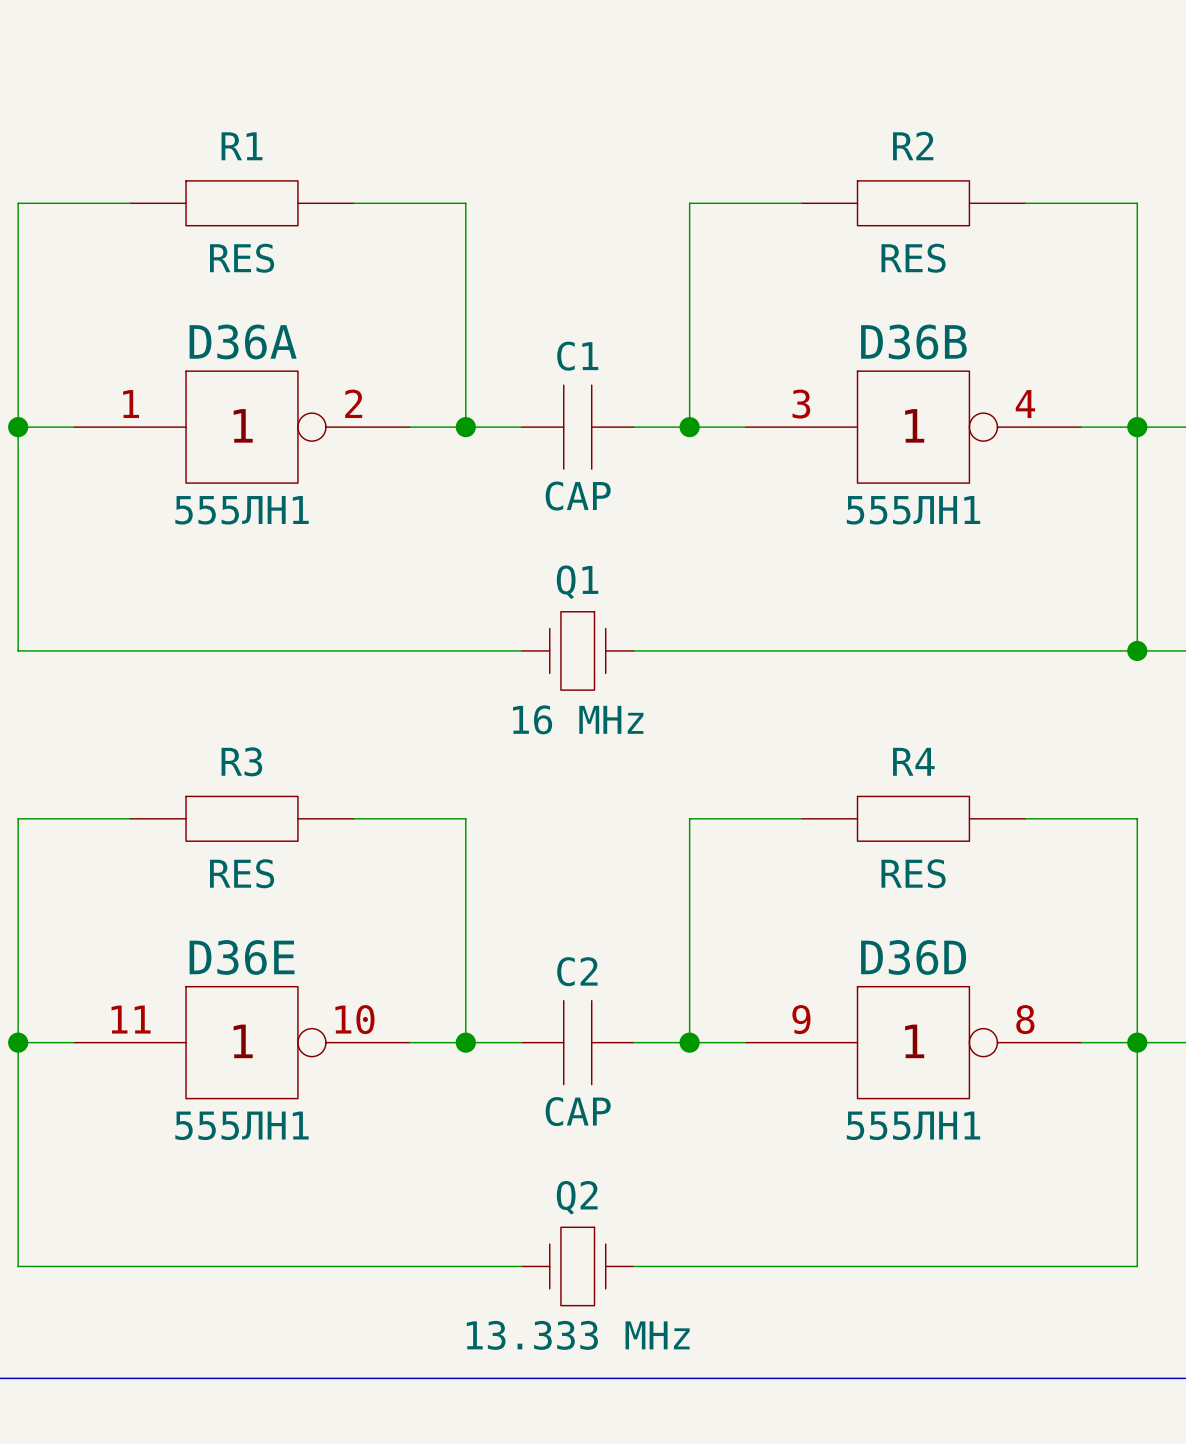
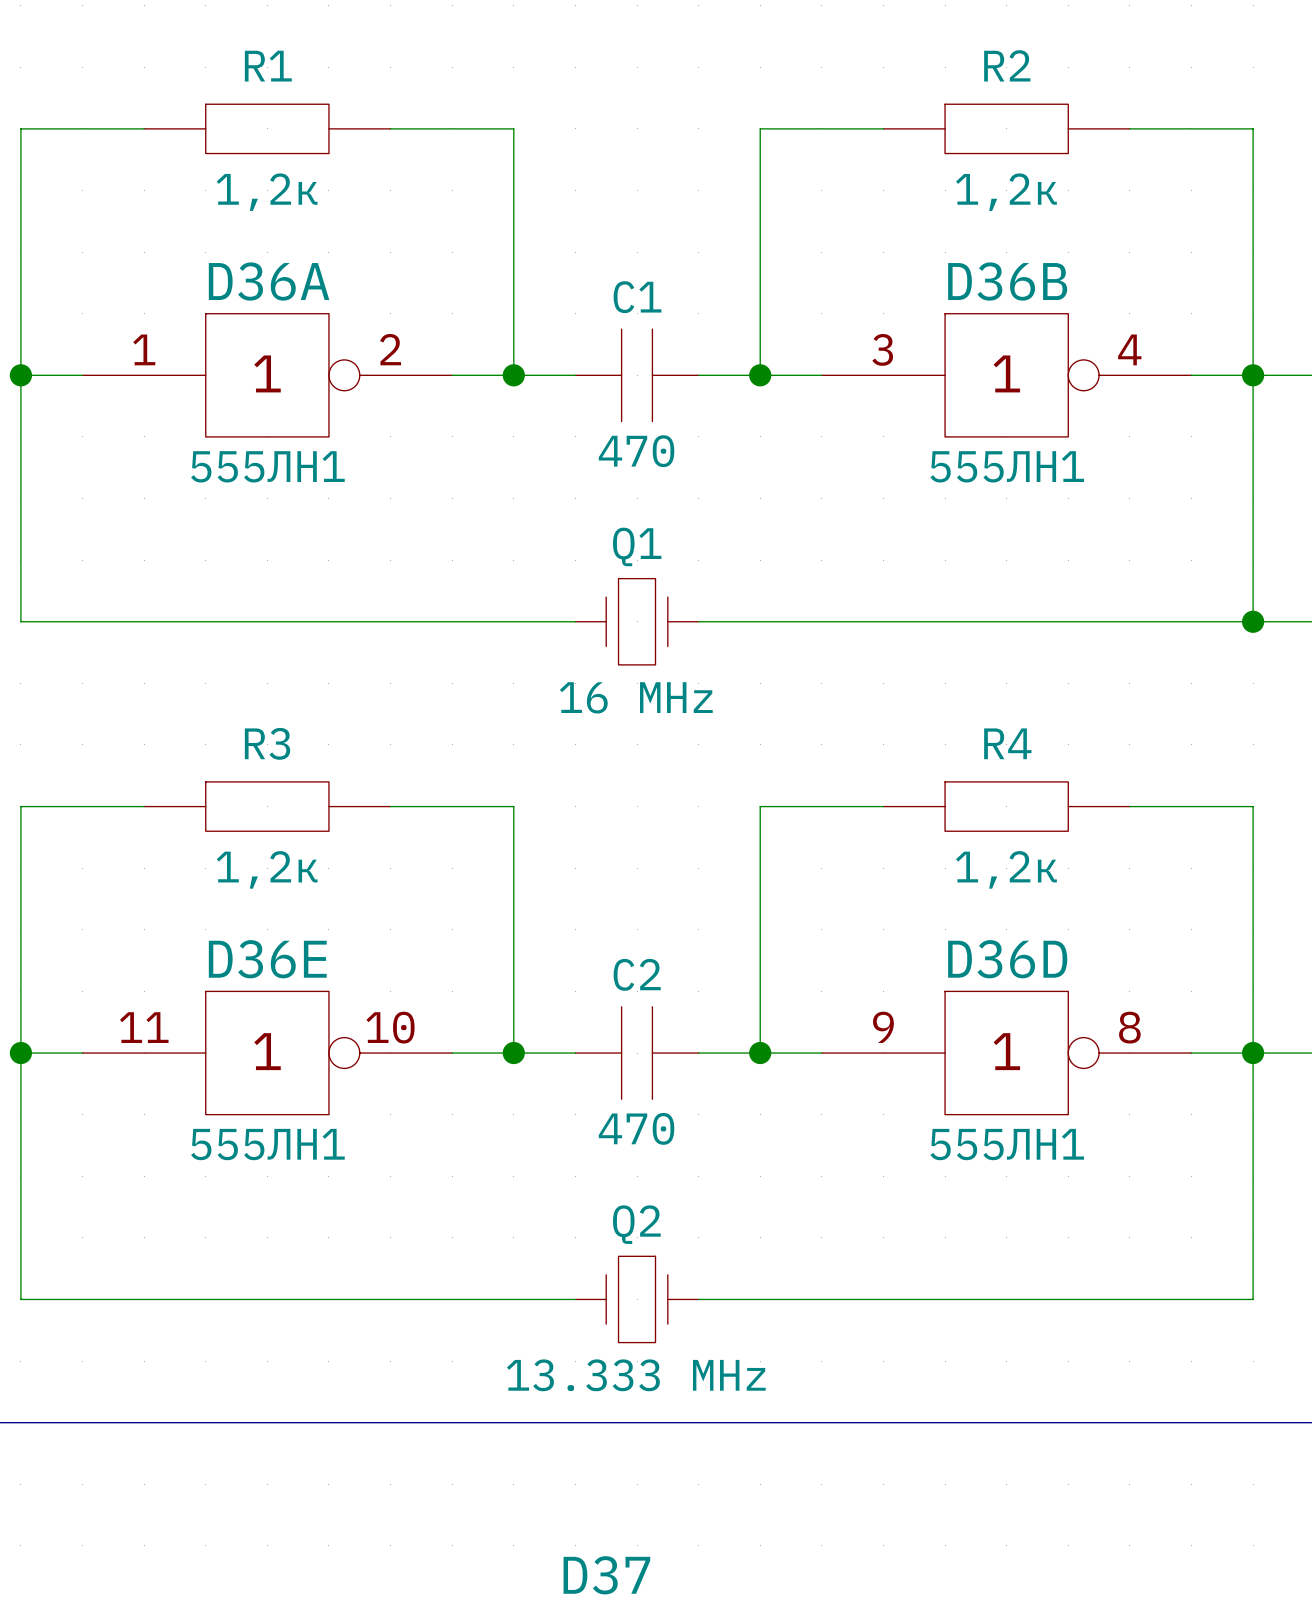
R1 value: RES (242, 258) -> 1,2к (267, 192)
R2 value: RES (913, 258) -> 1,2к (1006, 192)
C1 value: CAP (578, 496) -> 470 (636, 451)
R3 value: RES (242, 873) -> 1,2к (267, 869)
R4 value: RES (913, 873) -> 1,2к (1006, 869)
C2 value: CAP (578, 1111) -> 470 (636, 1128)

